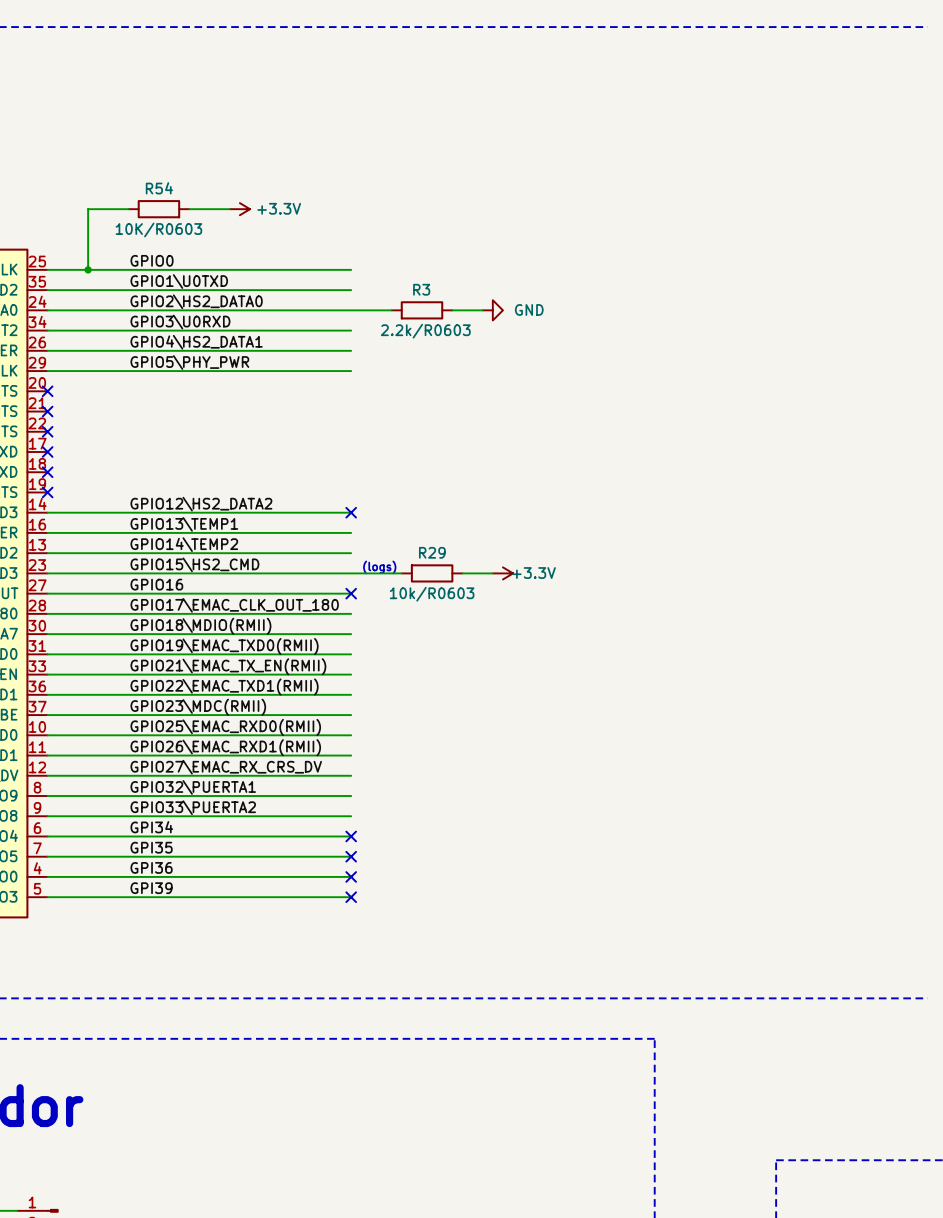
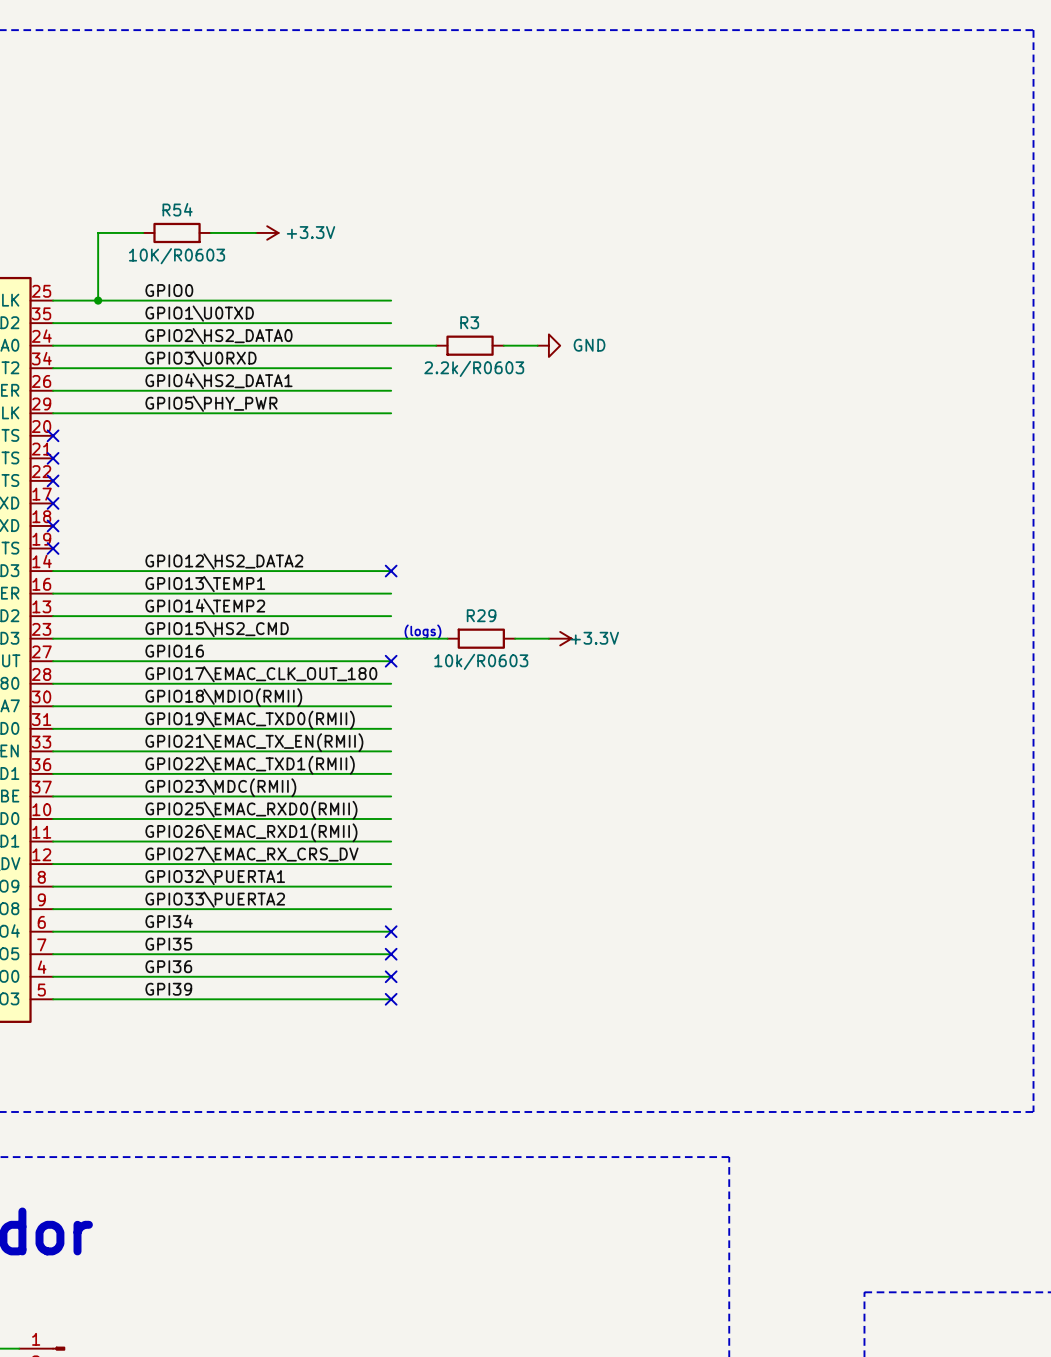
line: none -> (1033, 30) (1033, 1112)

